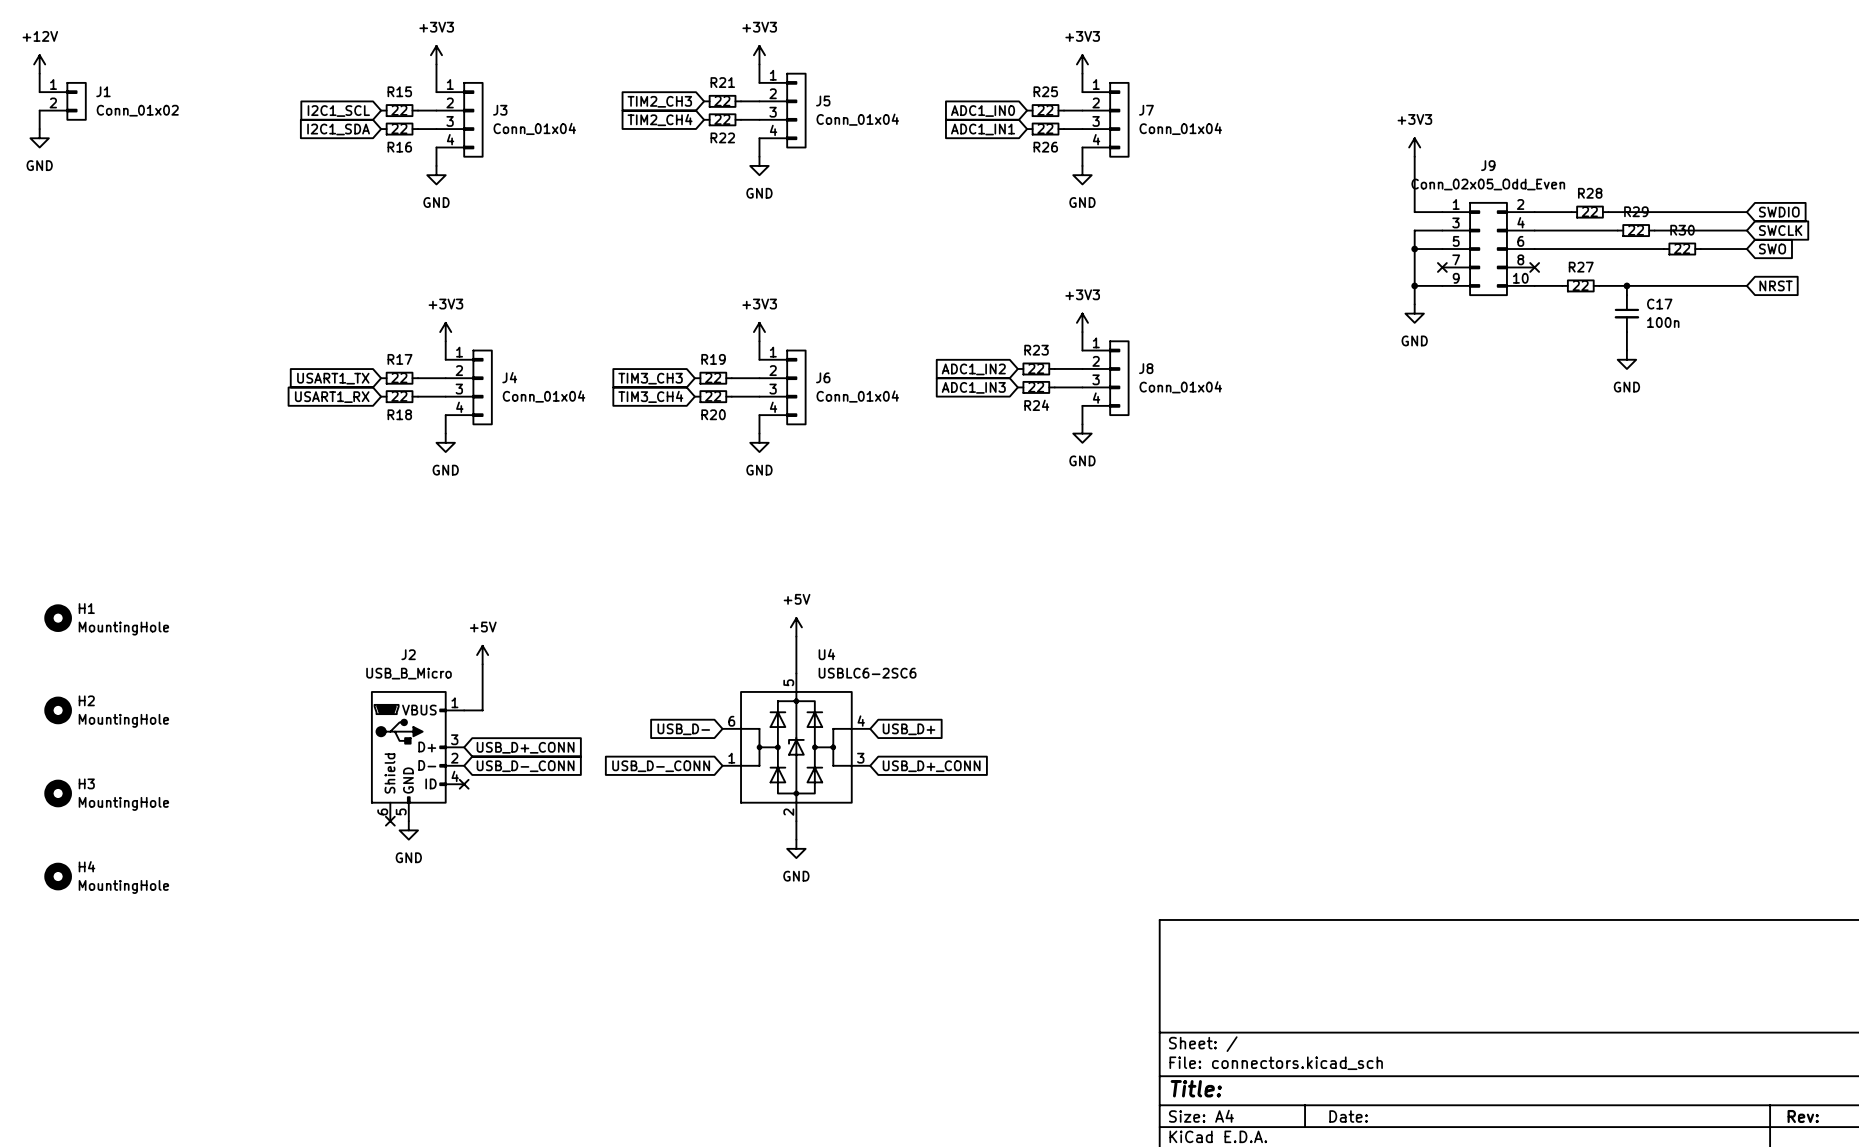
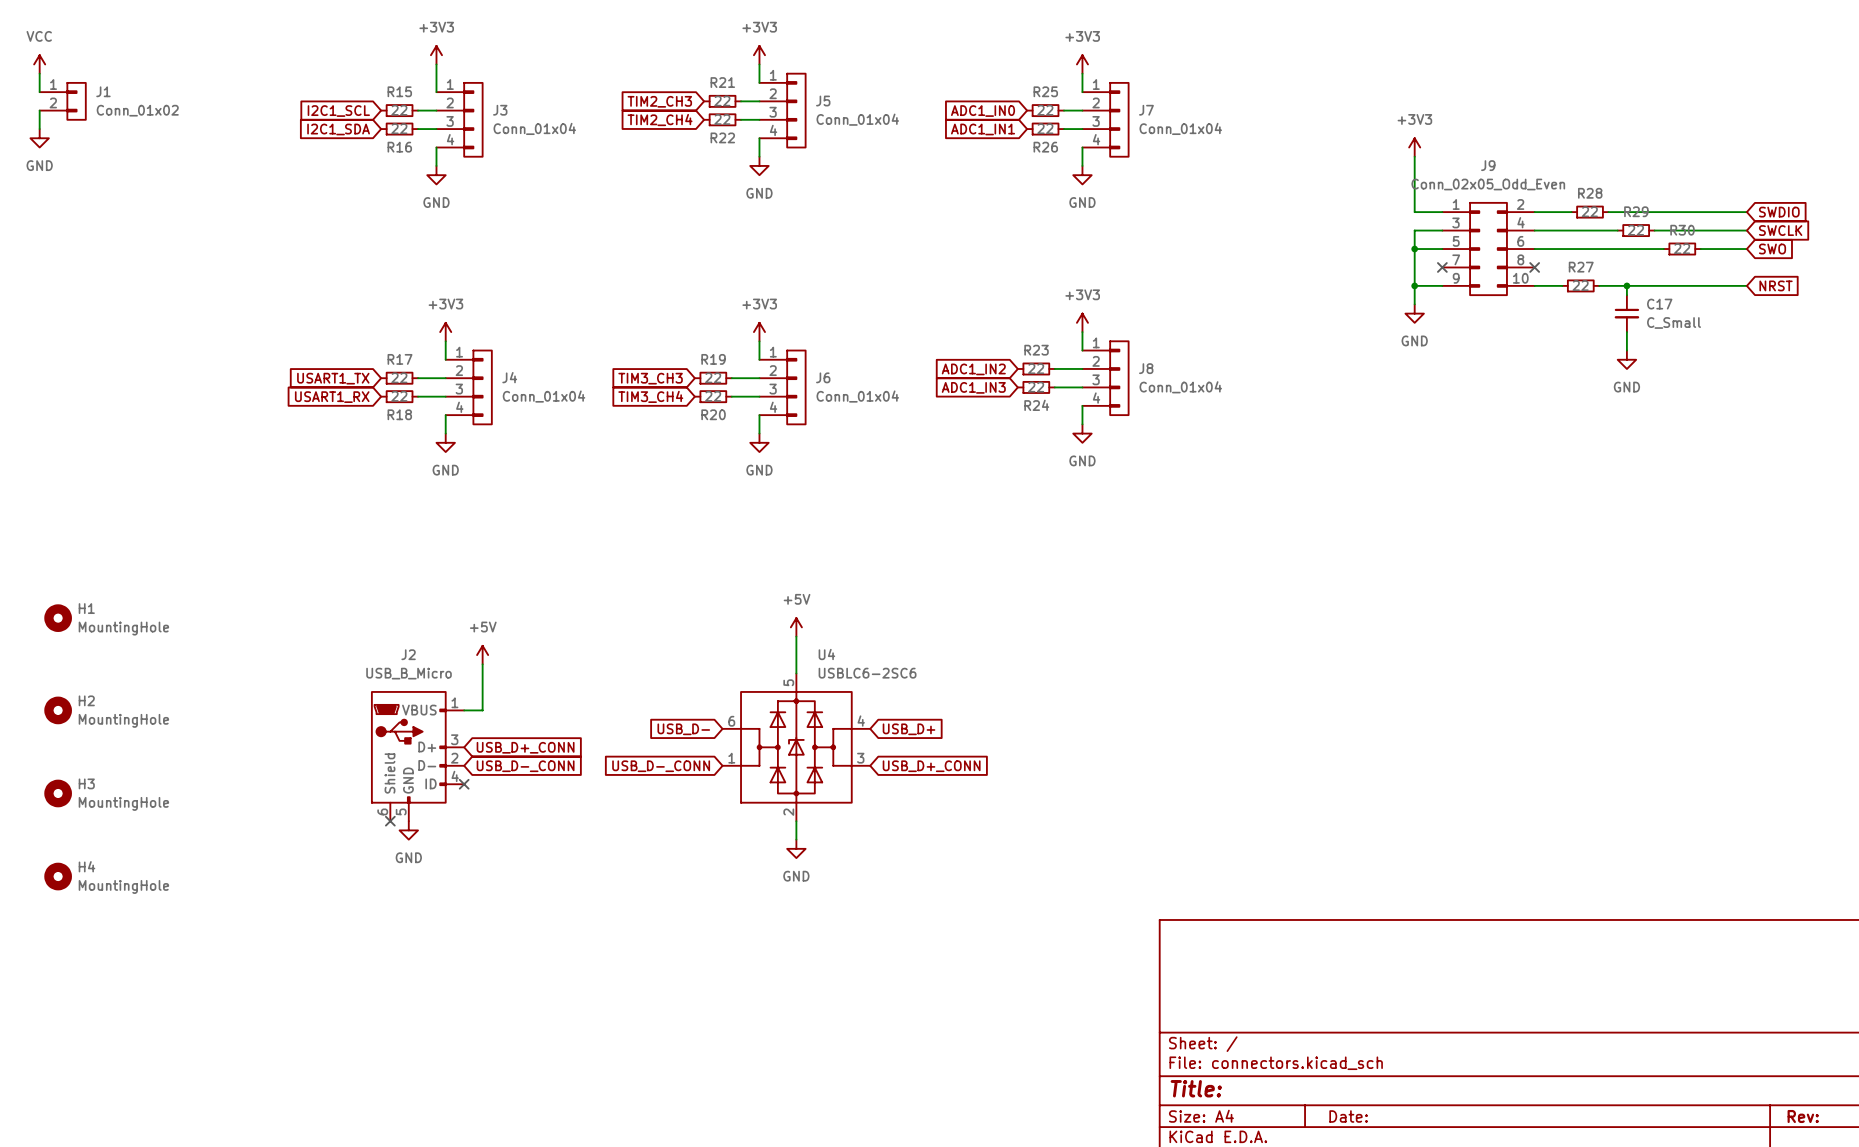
power symbol: +12V (39, 64) -> VCC (39, 64)
C17 value: 100n (1663, 322) -> C_Small (1674, 322)

